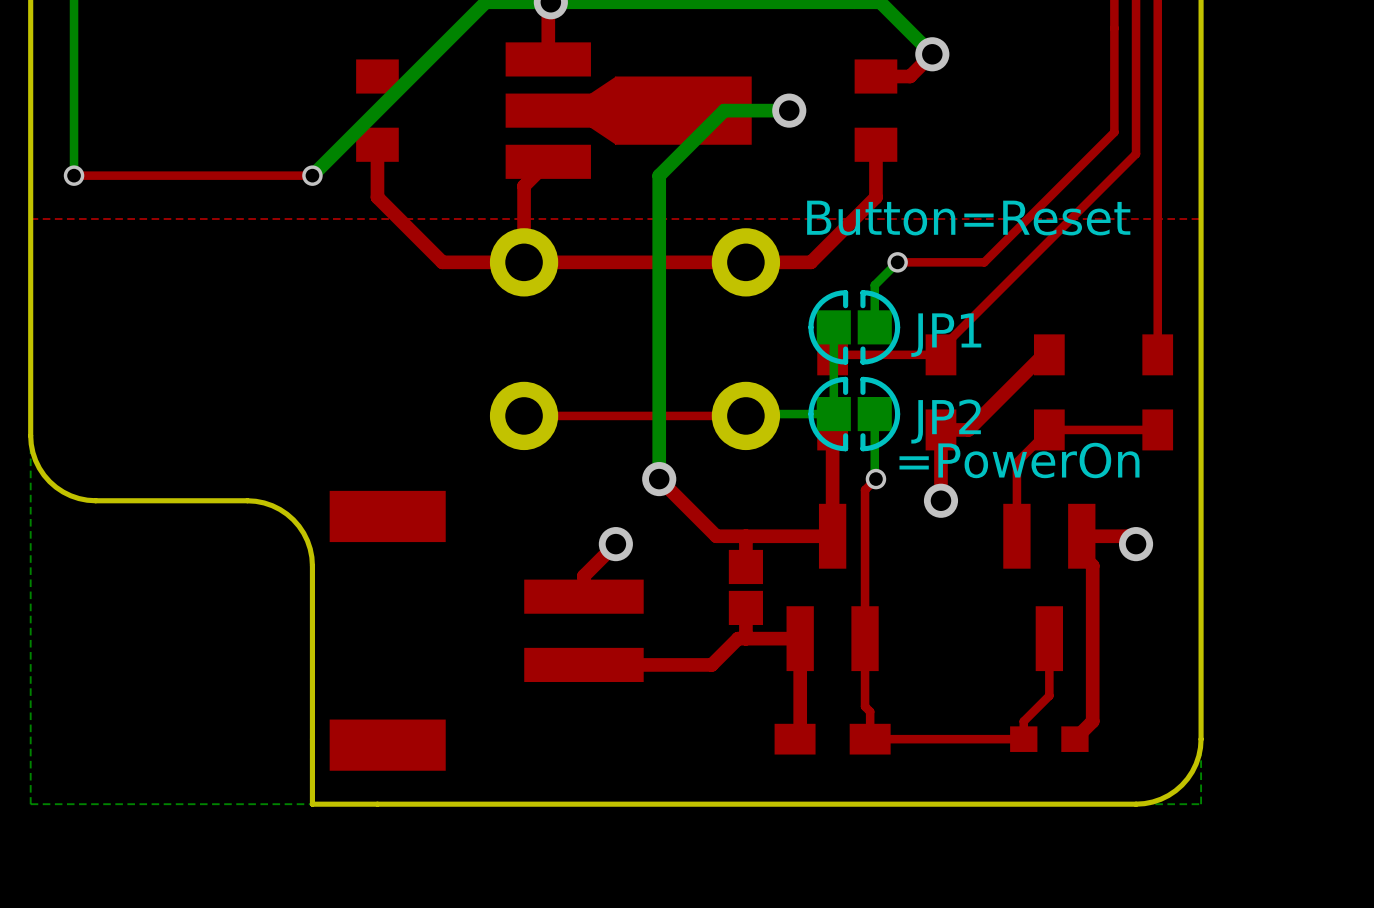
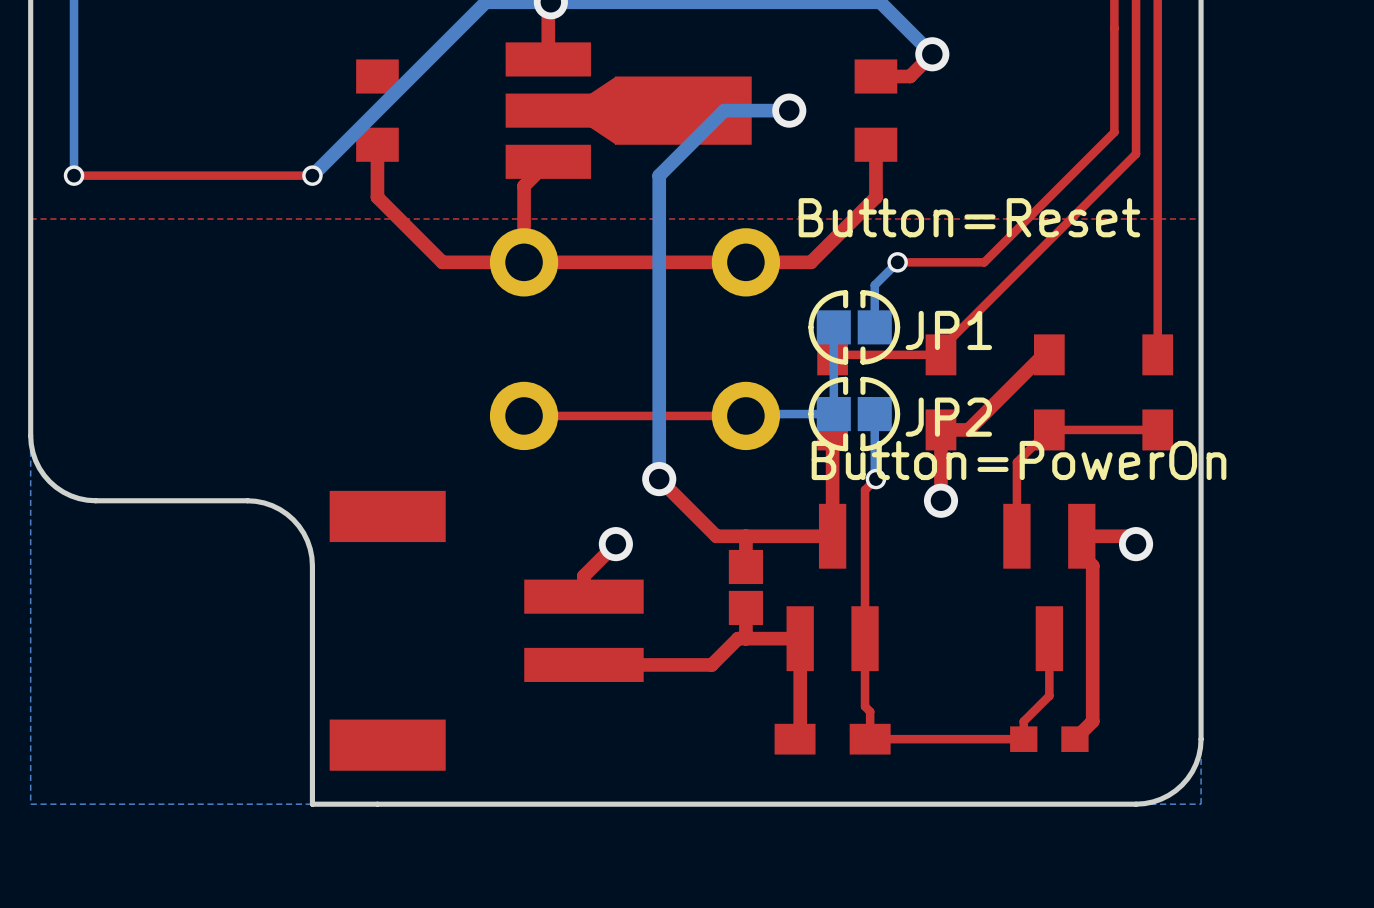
JP2 value: =PowerOn (1019, 460) -> Button=PowerOn (1019, 460)

